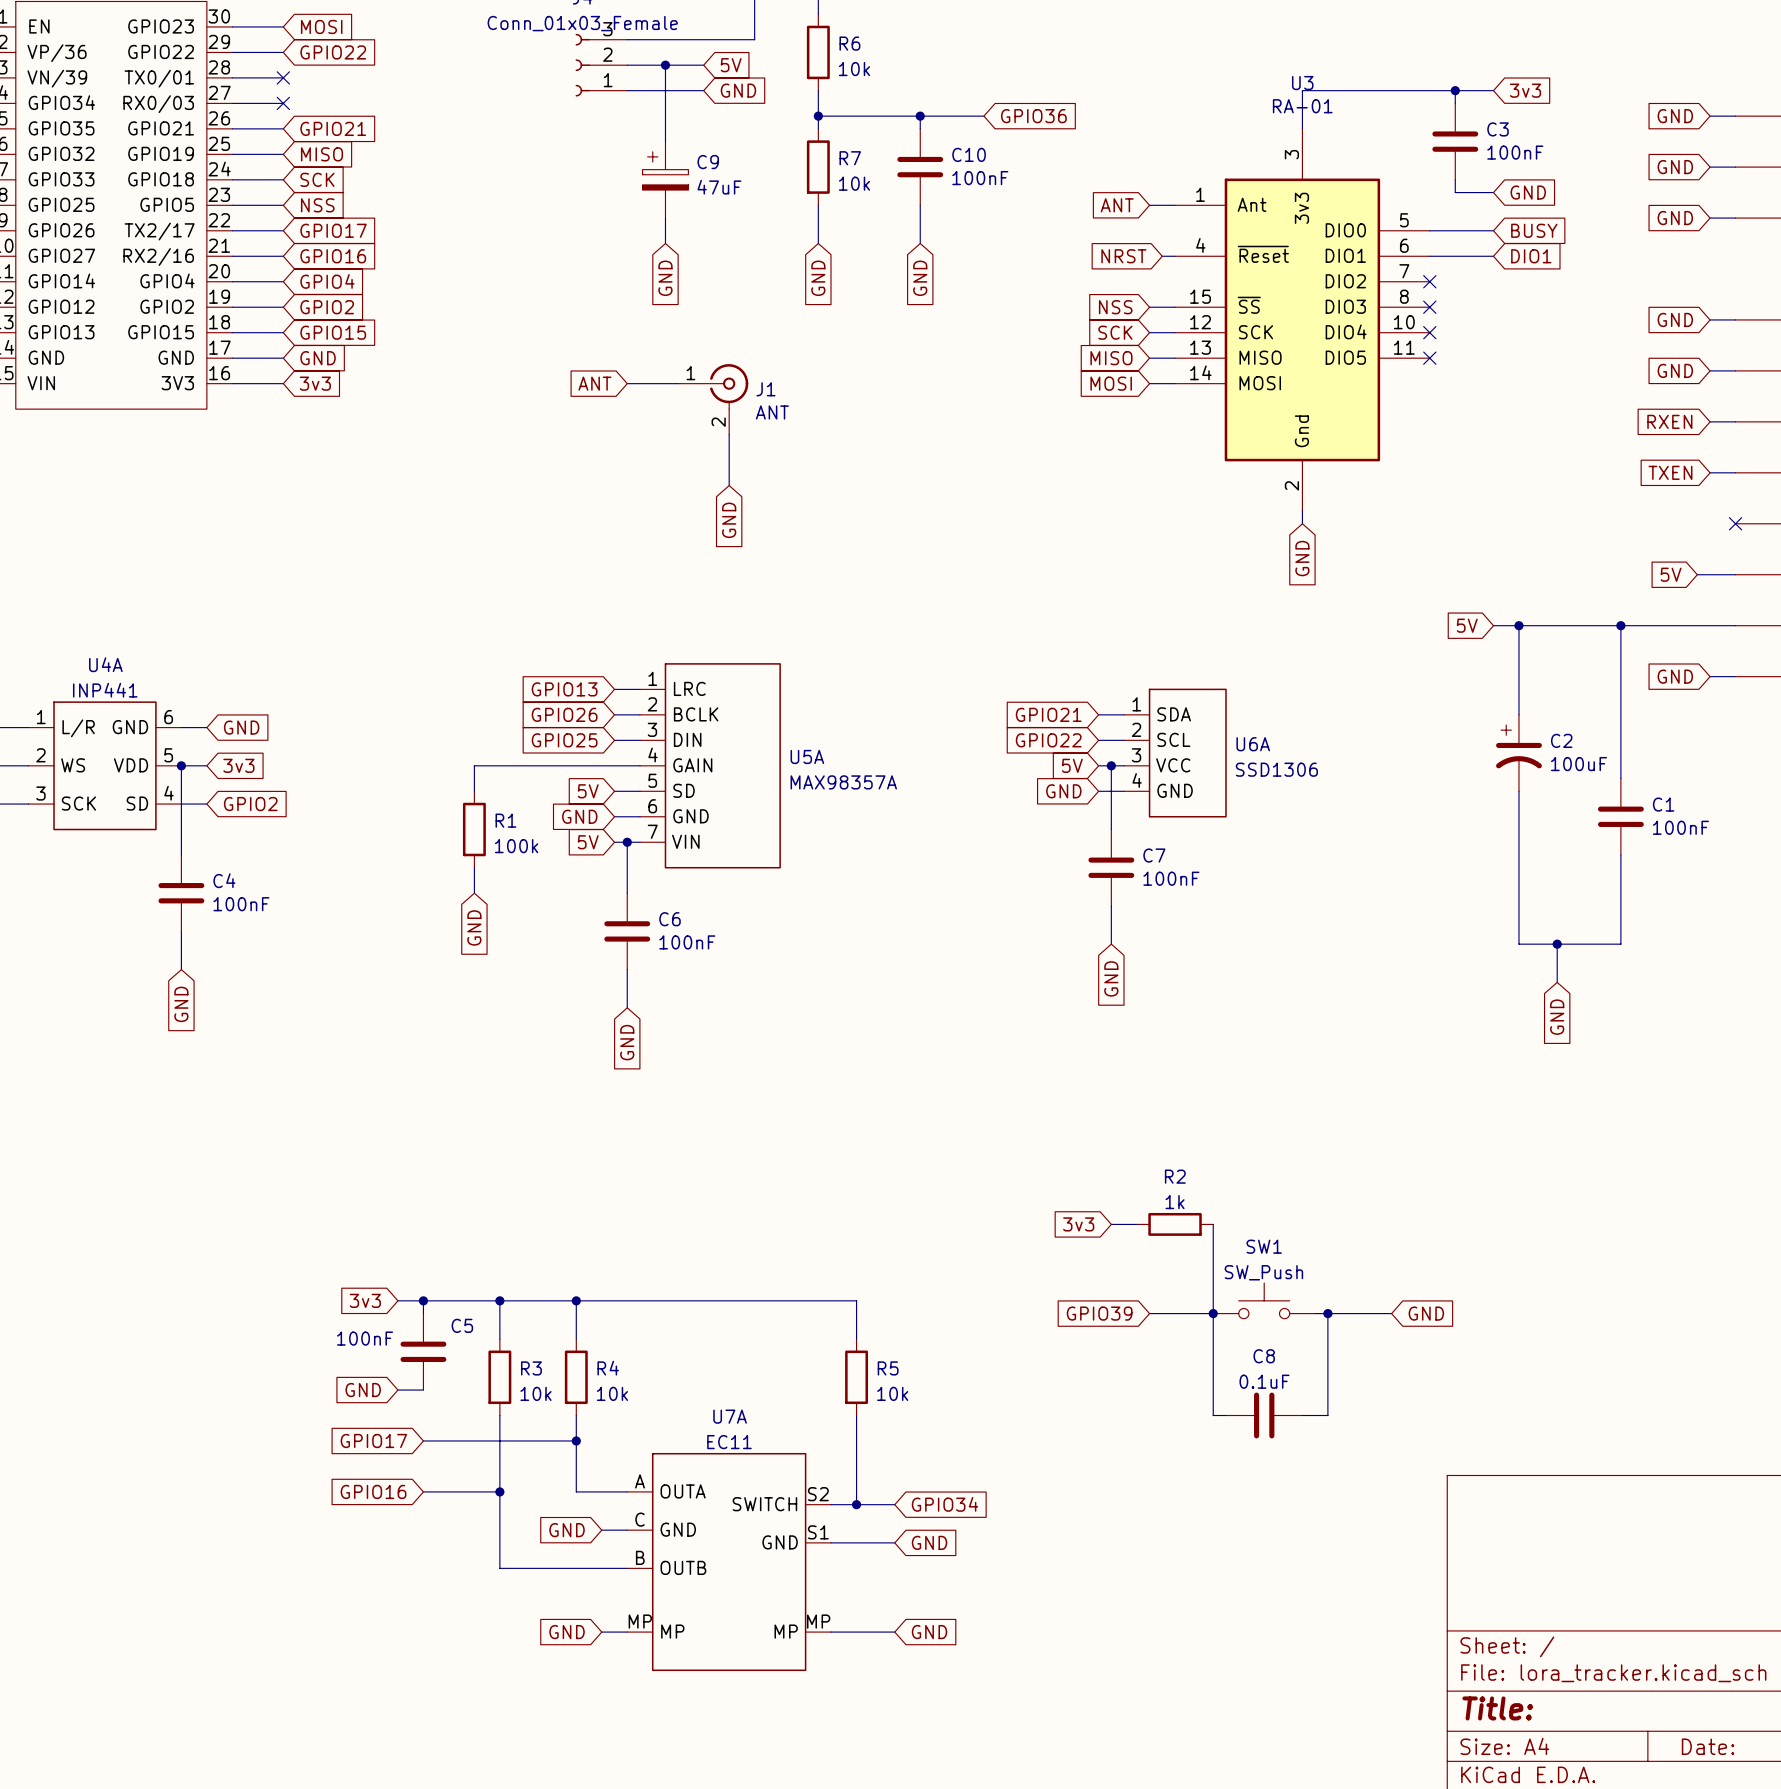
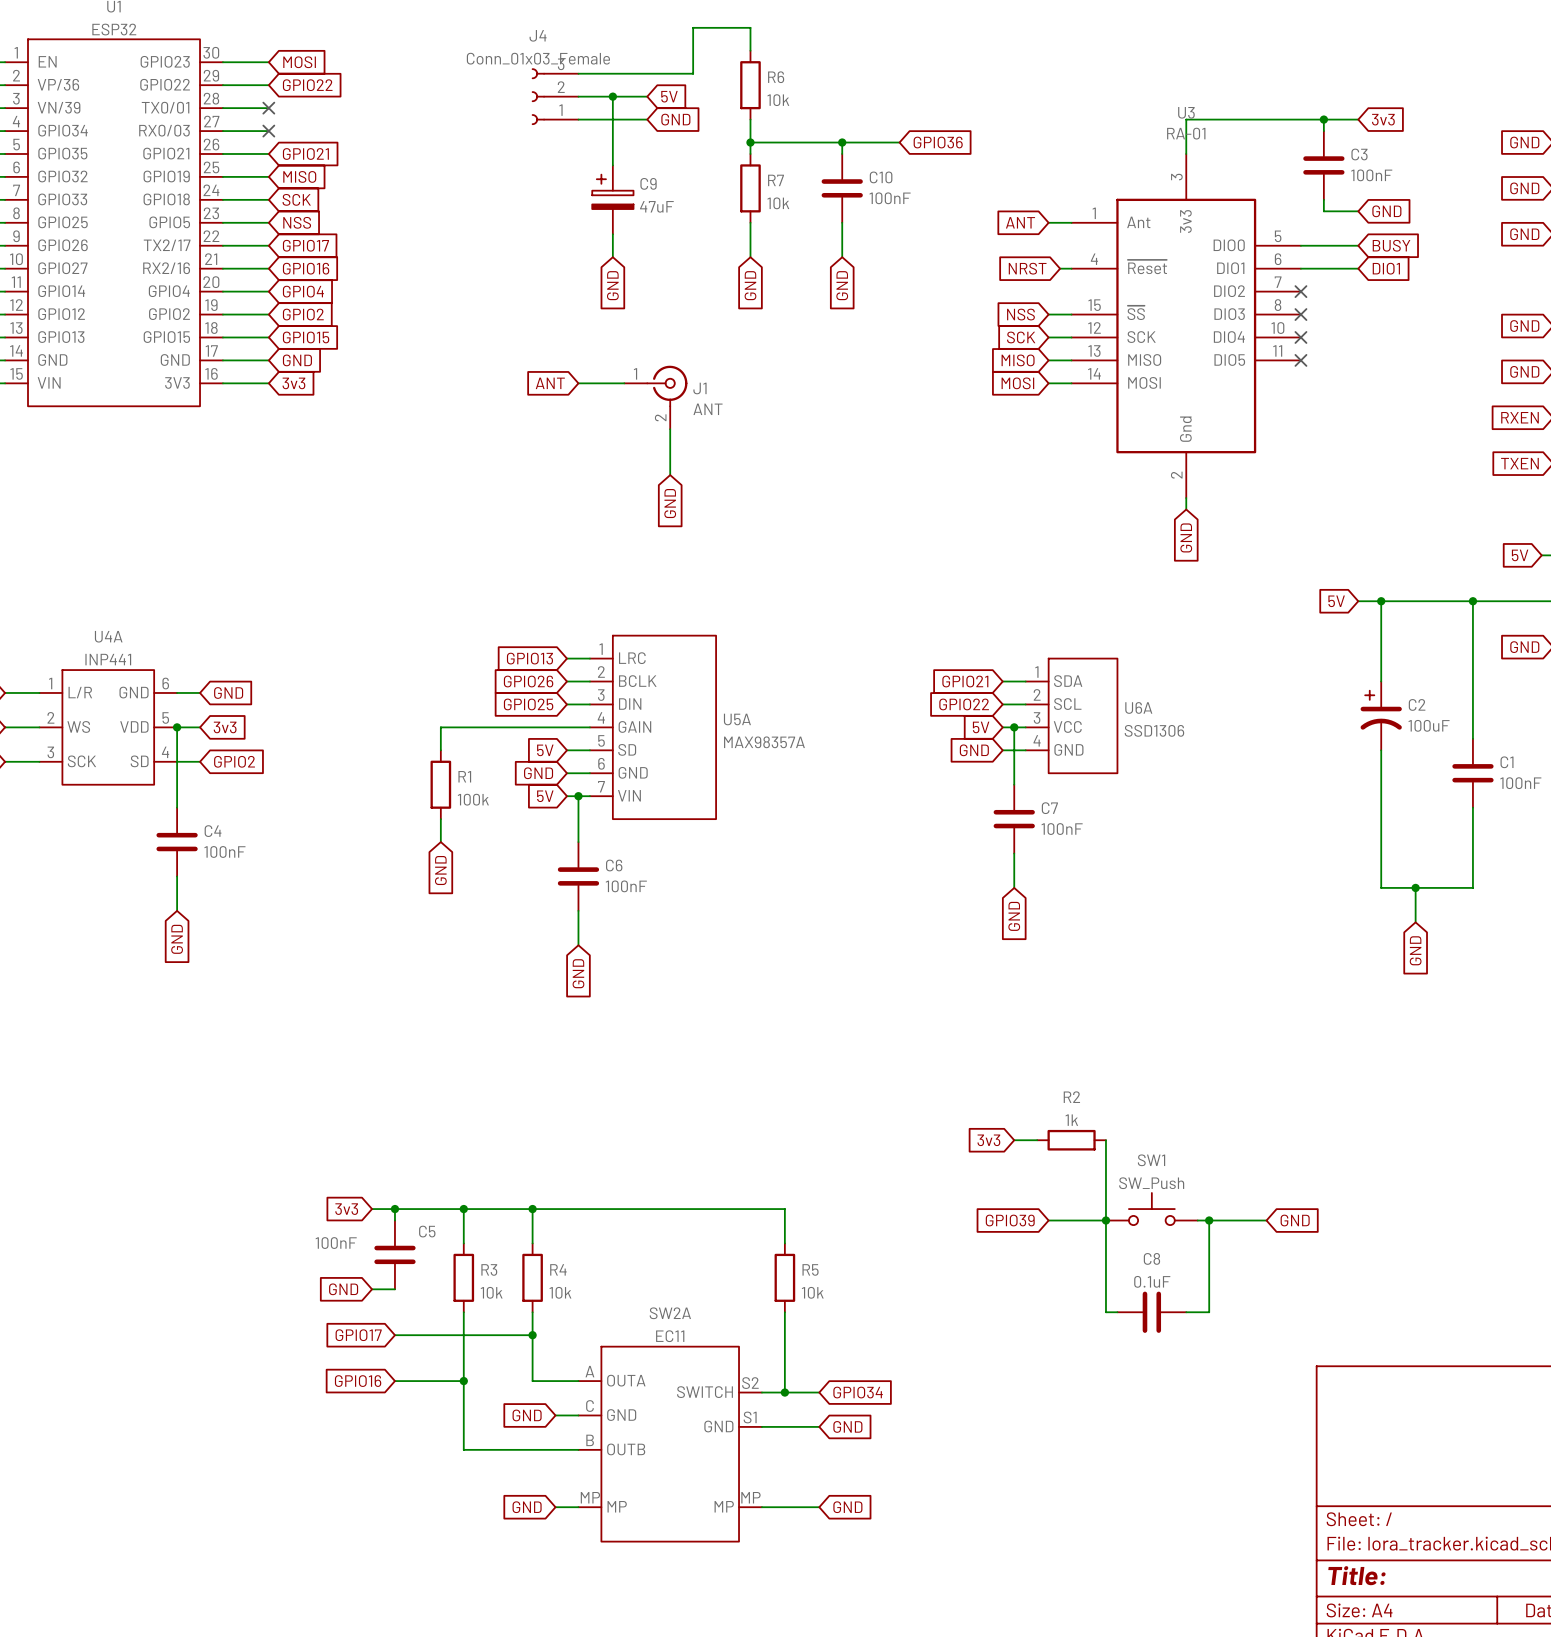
U7A name: U7A (730, 1416) -> SW2A (670, 1313)

